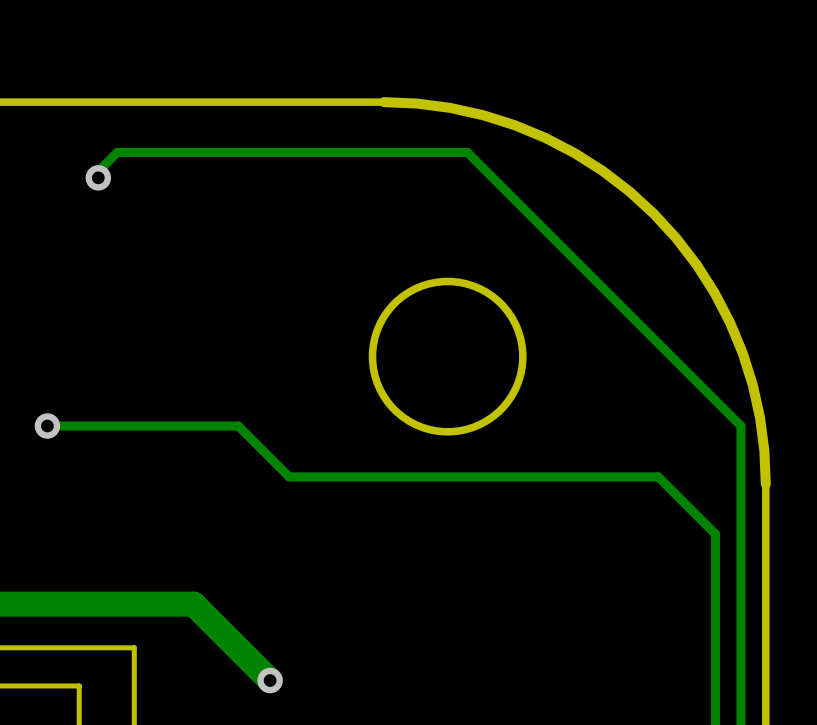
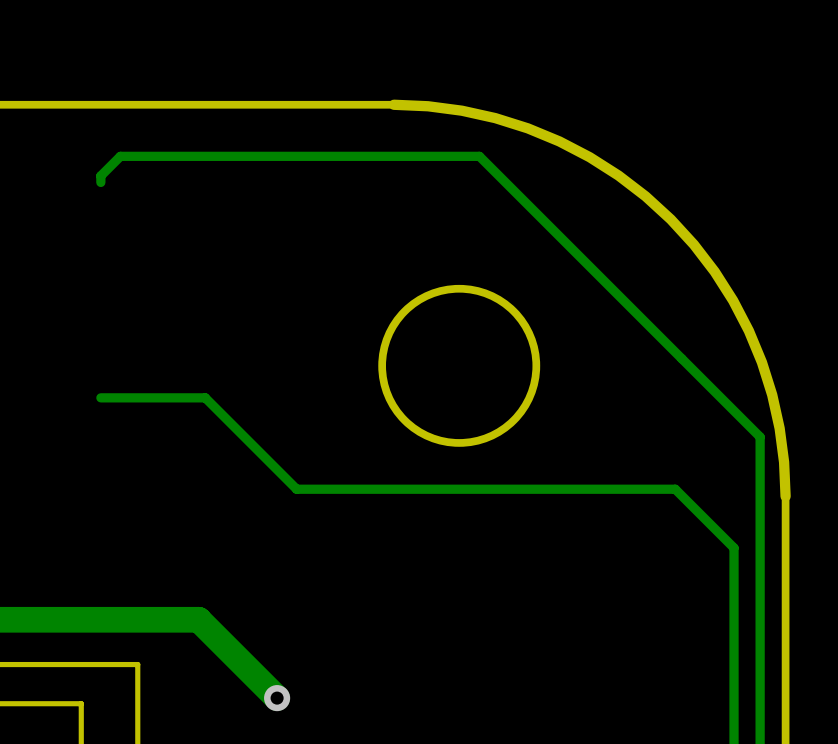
via: (98, 177) -> none
via: (47, 426) -> none
track: (238, 426) (47, 426) -> (244, 437) (205, 397) (100, 397)

